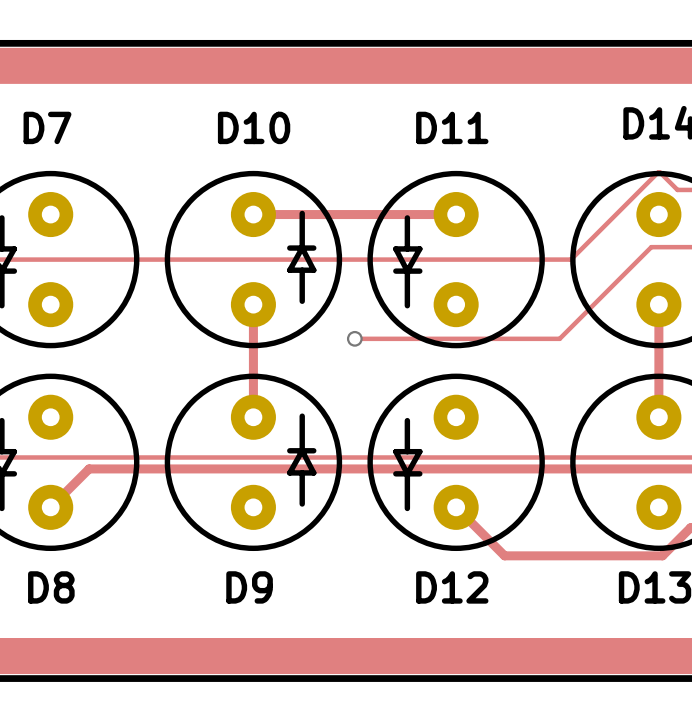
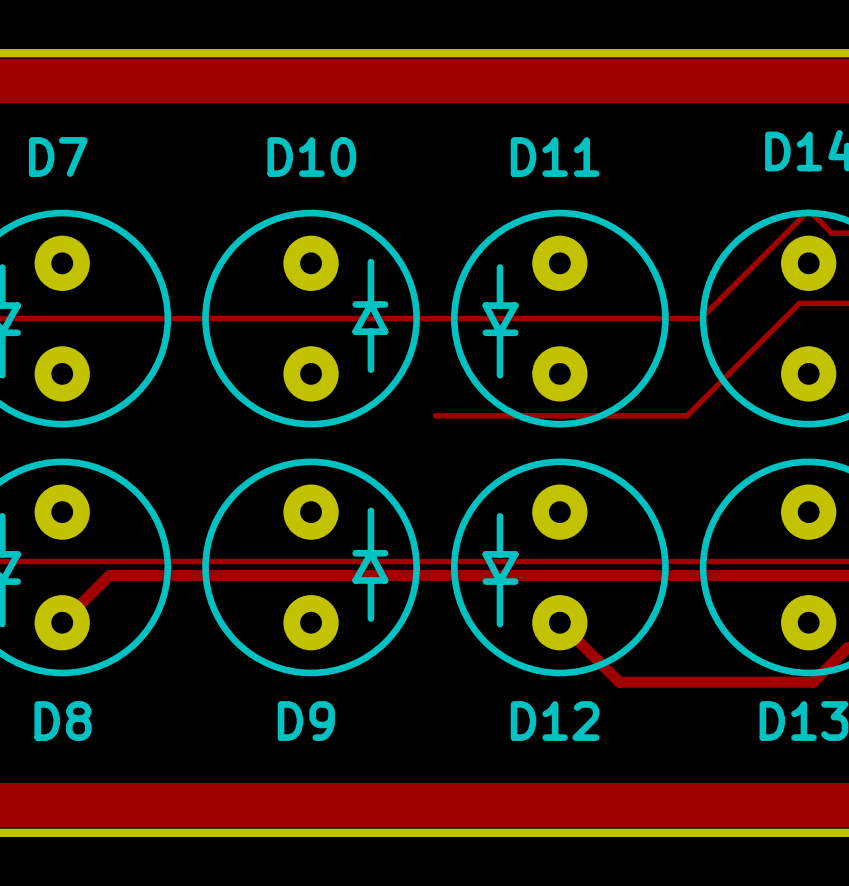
track: (253, 214) (456, 214) -> none
track: (253, 304) (253, 417) -> none
track: (658, 304) (658, 417) -> none
via: (354, 338) -> none

